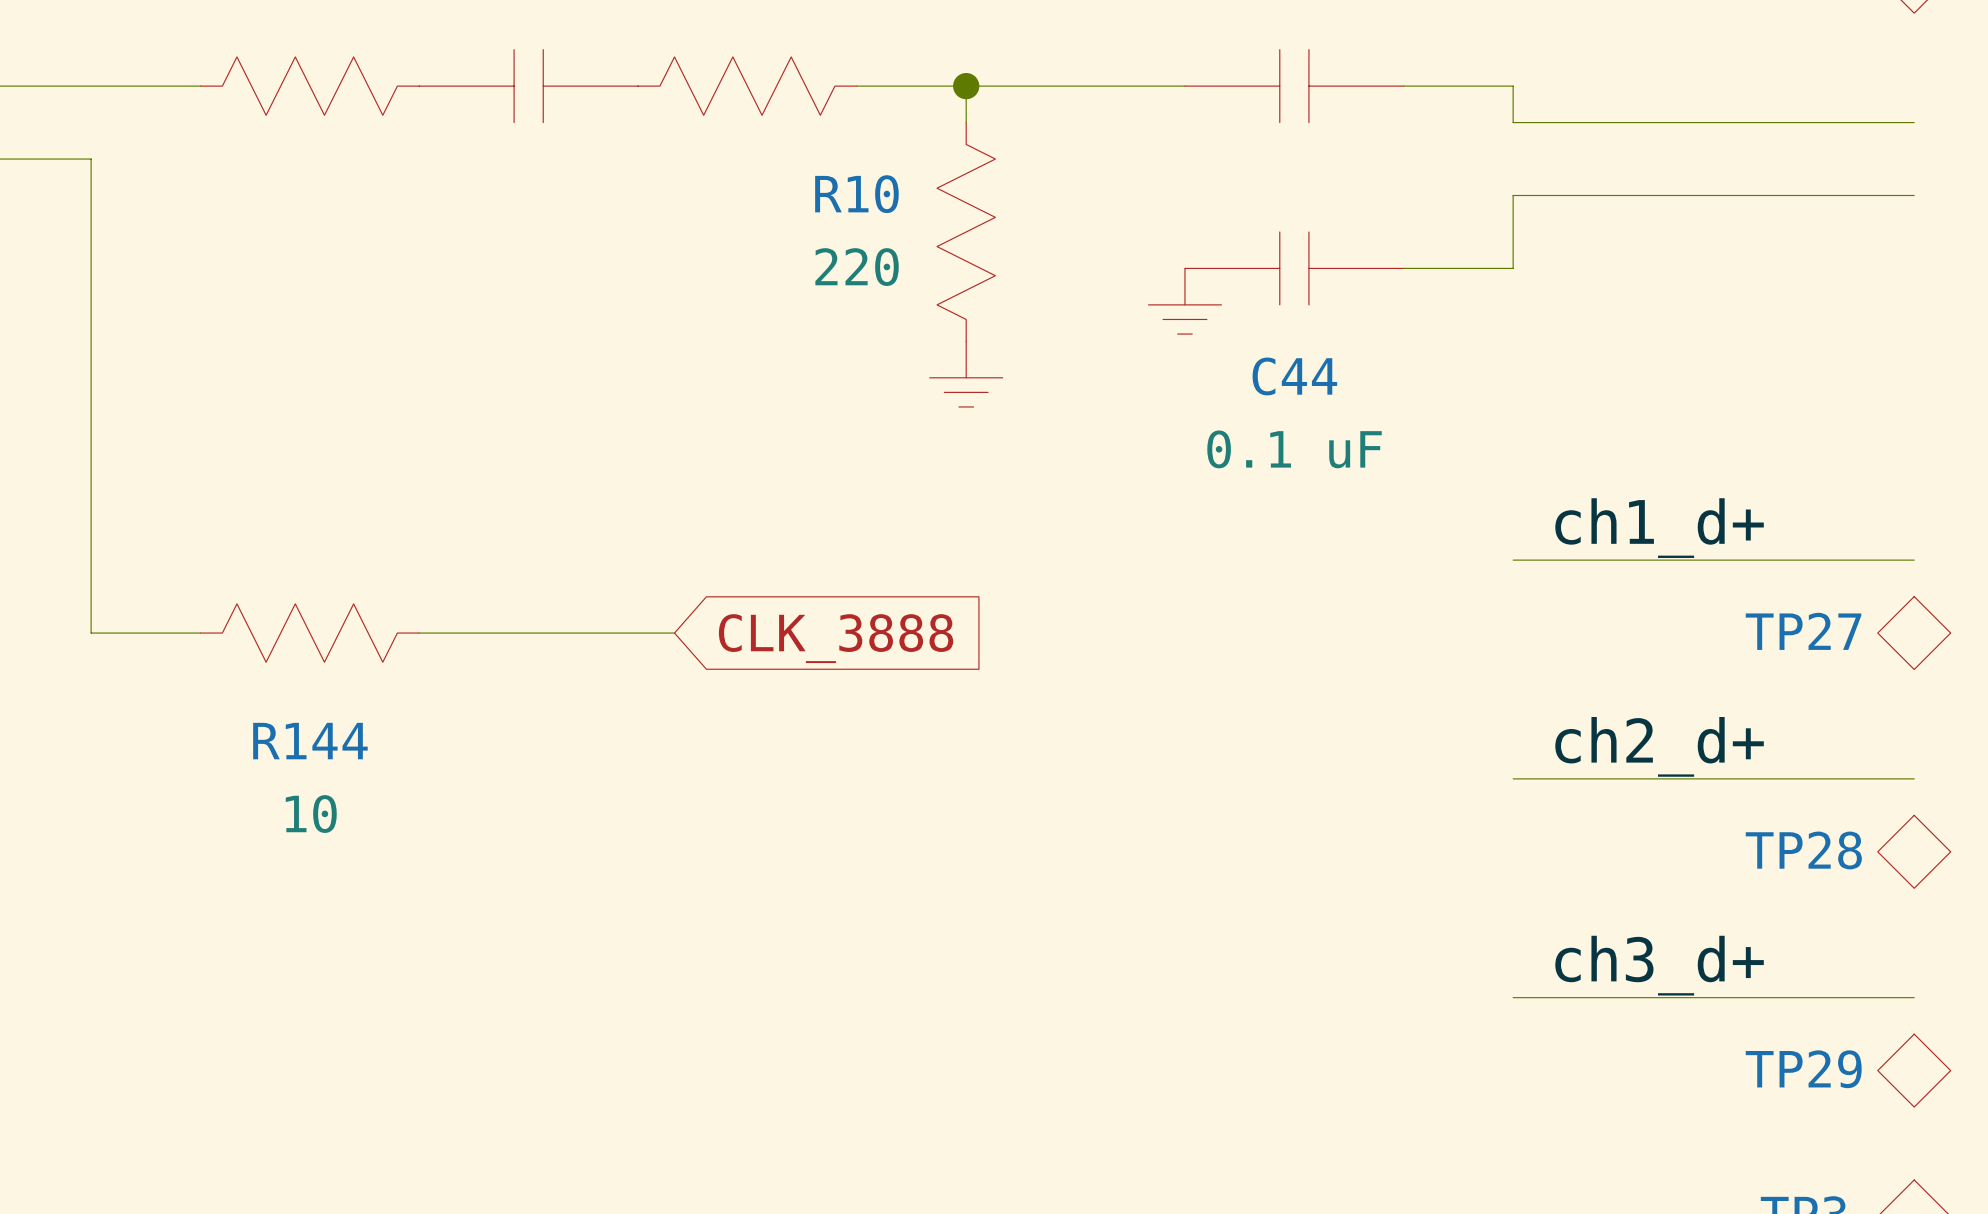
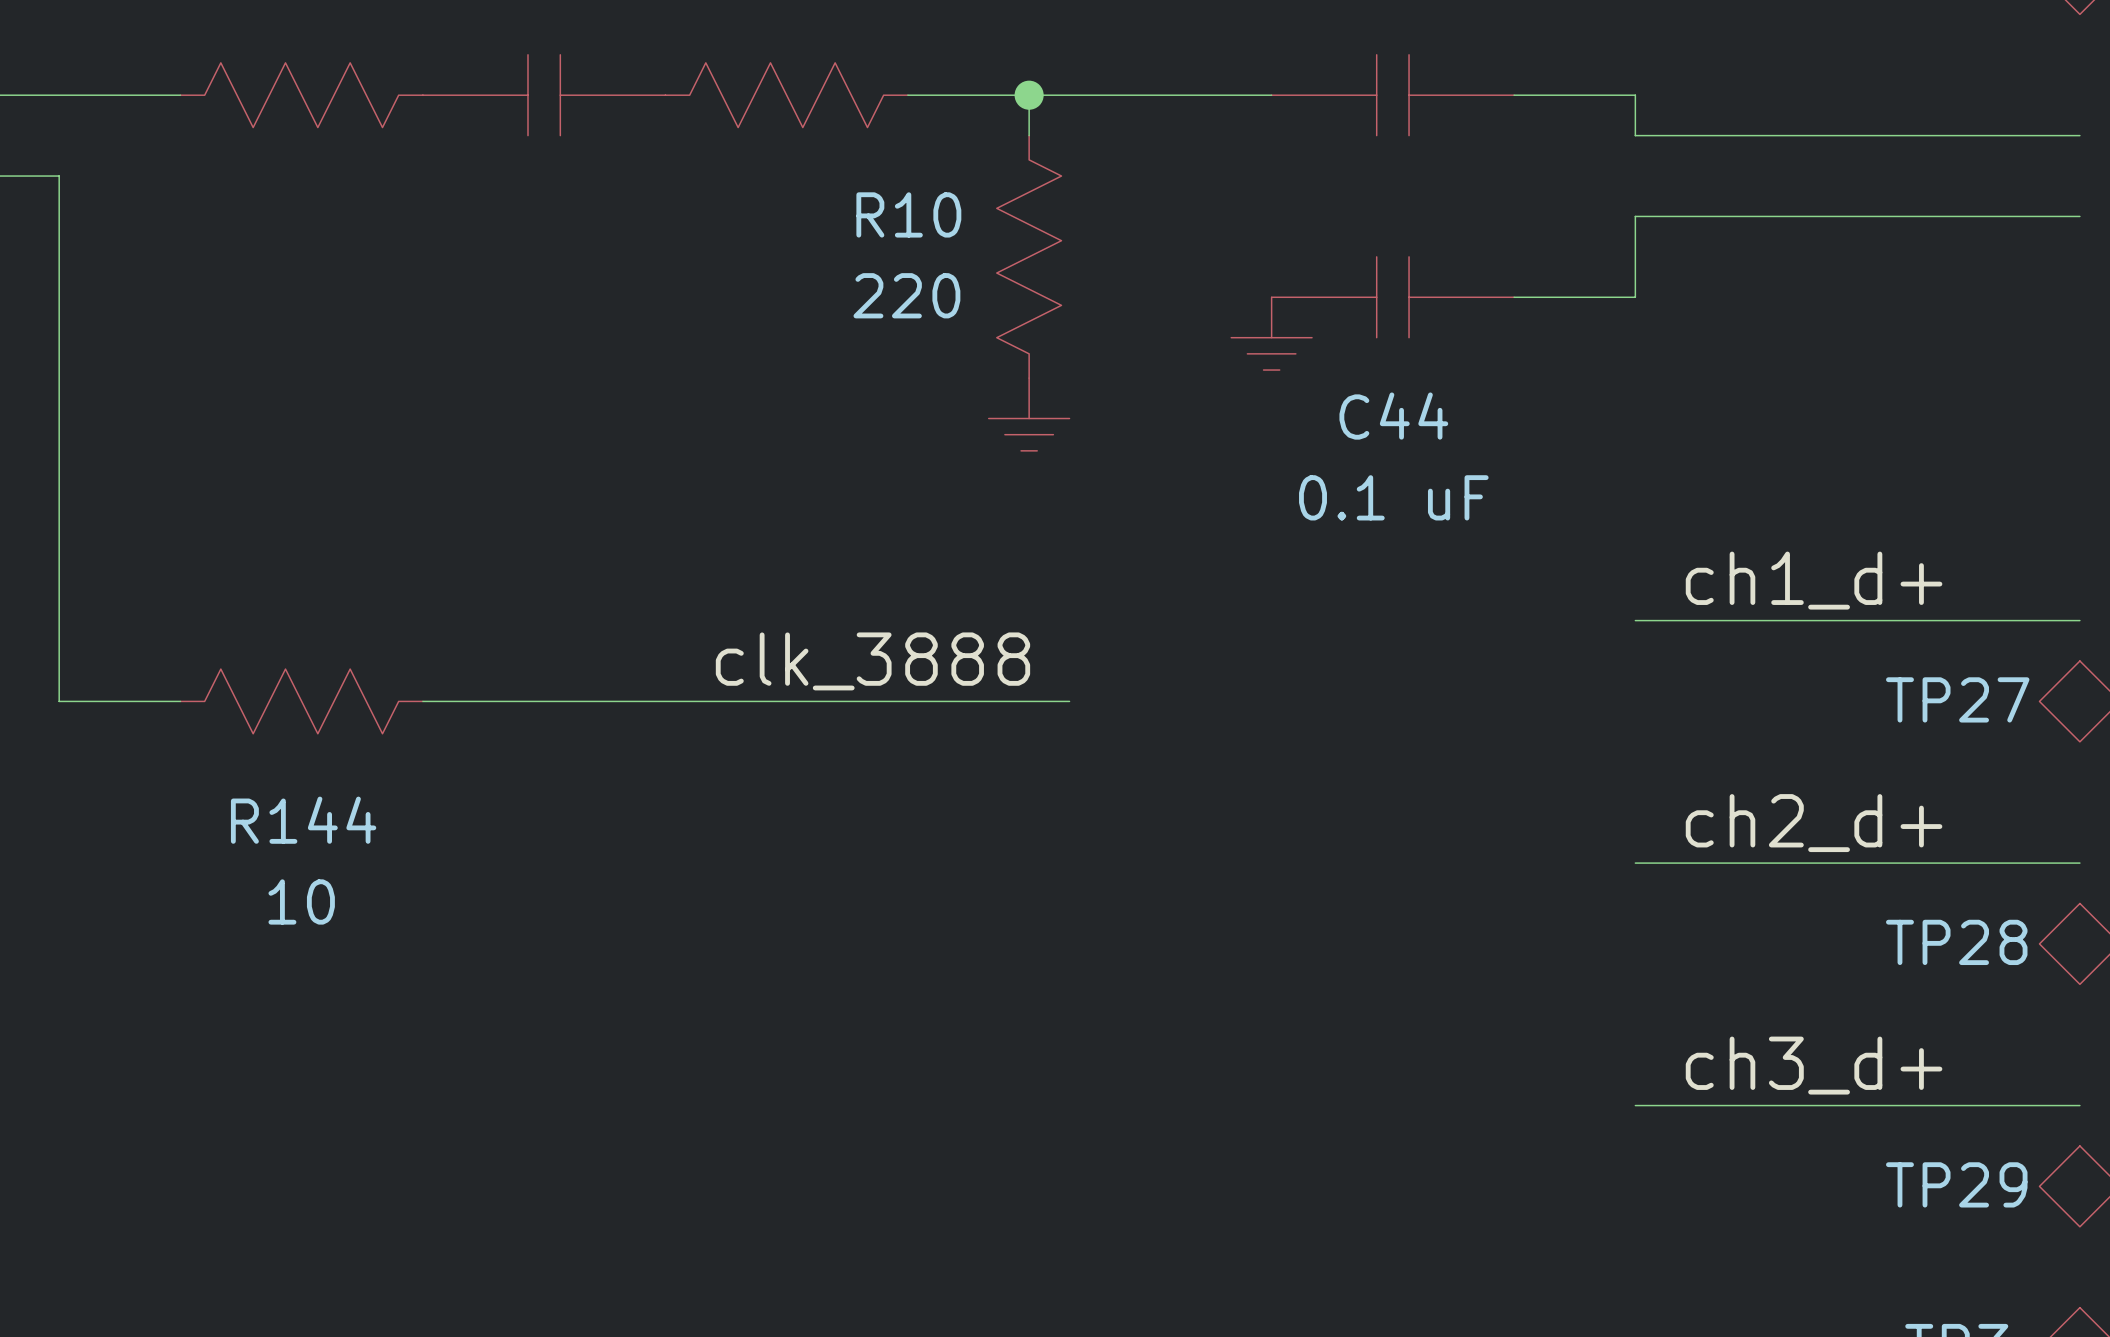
label: none -> clk_3888 (872, 661)
wire: none -> (705, 701) (1069, 701)
global label: CLK_3888 (836, 638) -> none

